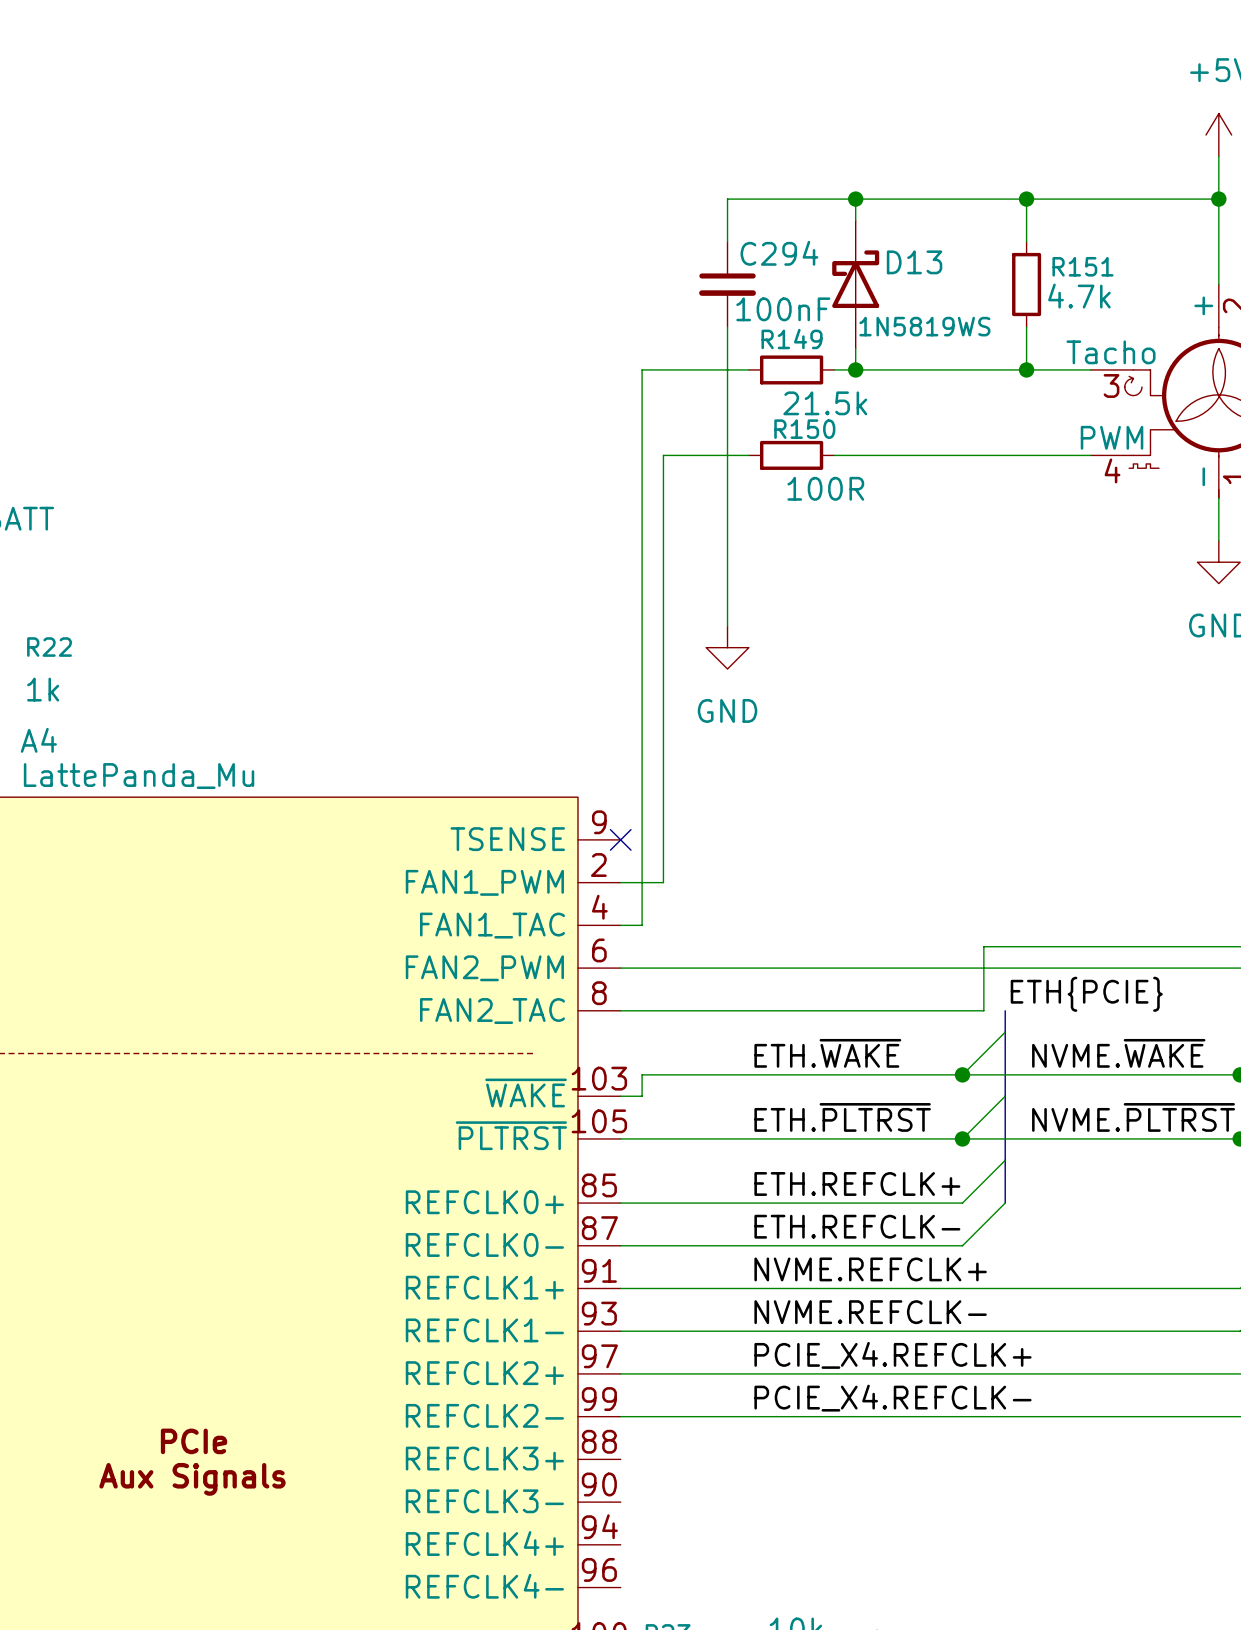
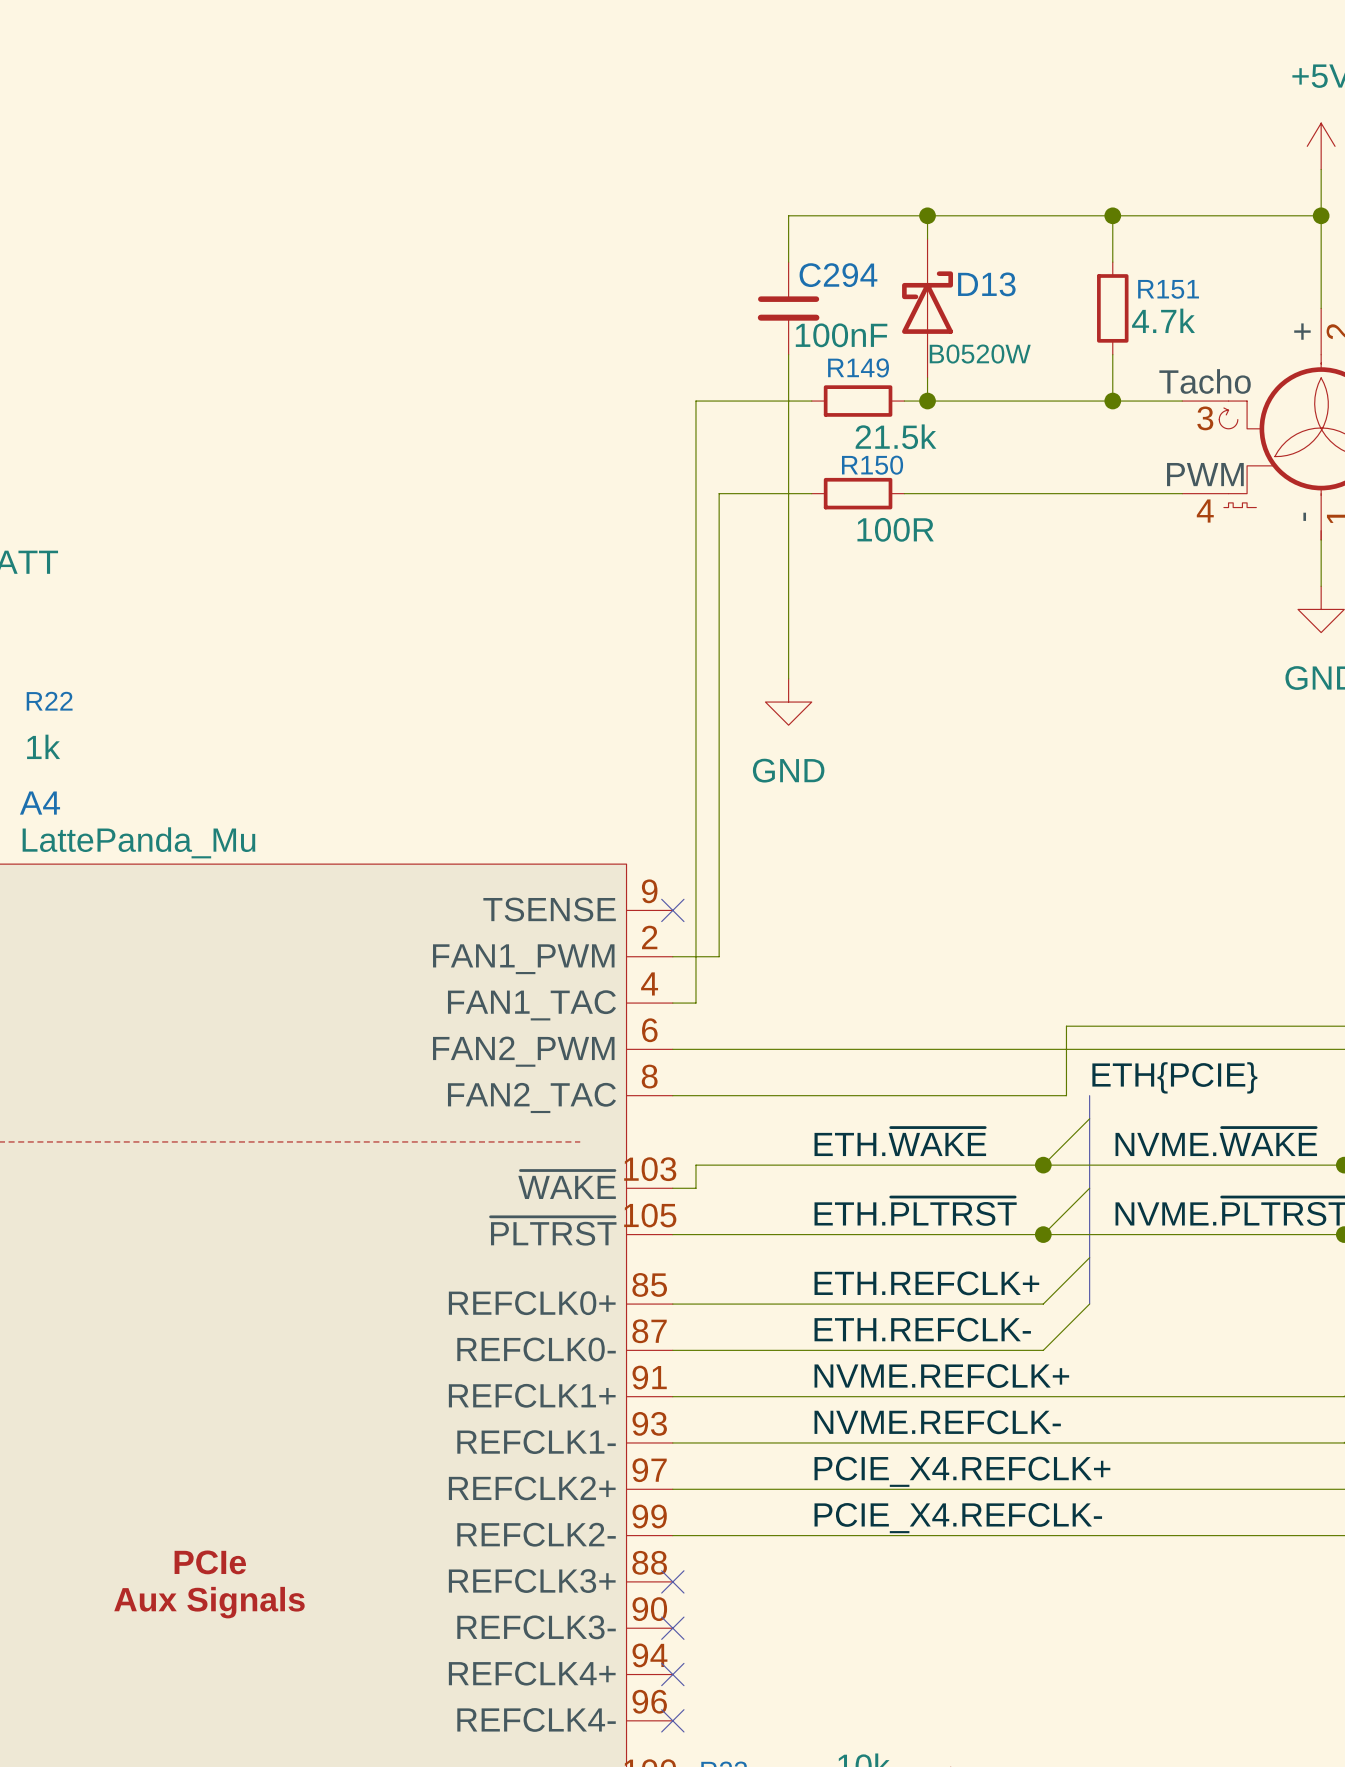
D13 value: 1N5819WS (924, 326) -> B0520W (980, 354)
no-connect mark: none -> (672, 1581)
no-connect mark: none -> (672, 1628)
no-connect mark: none -> (672, 1674)
no-connect mark: none -> (672, 1720)

